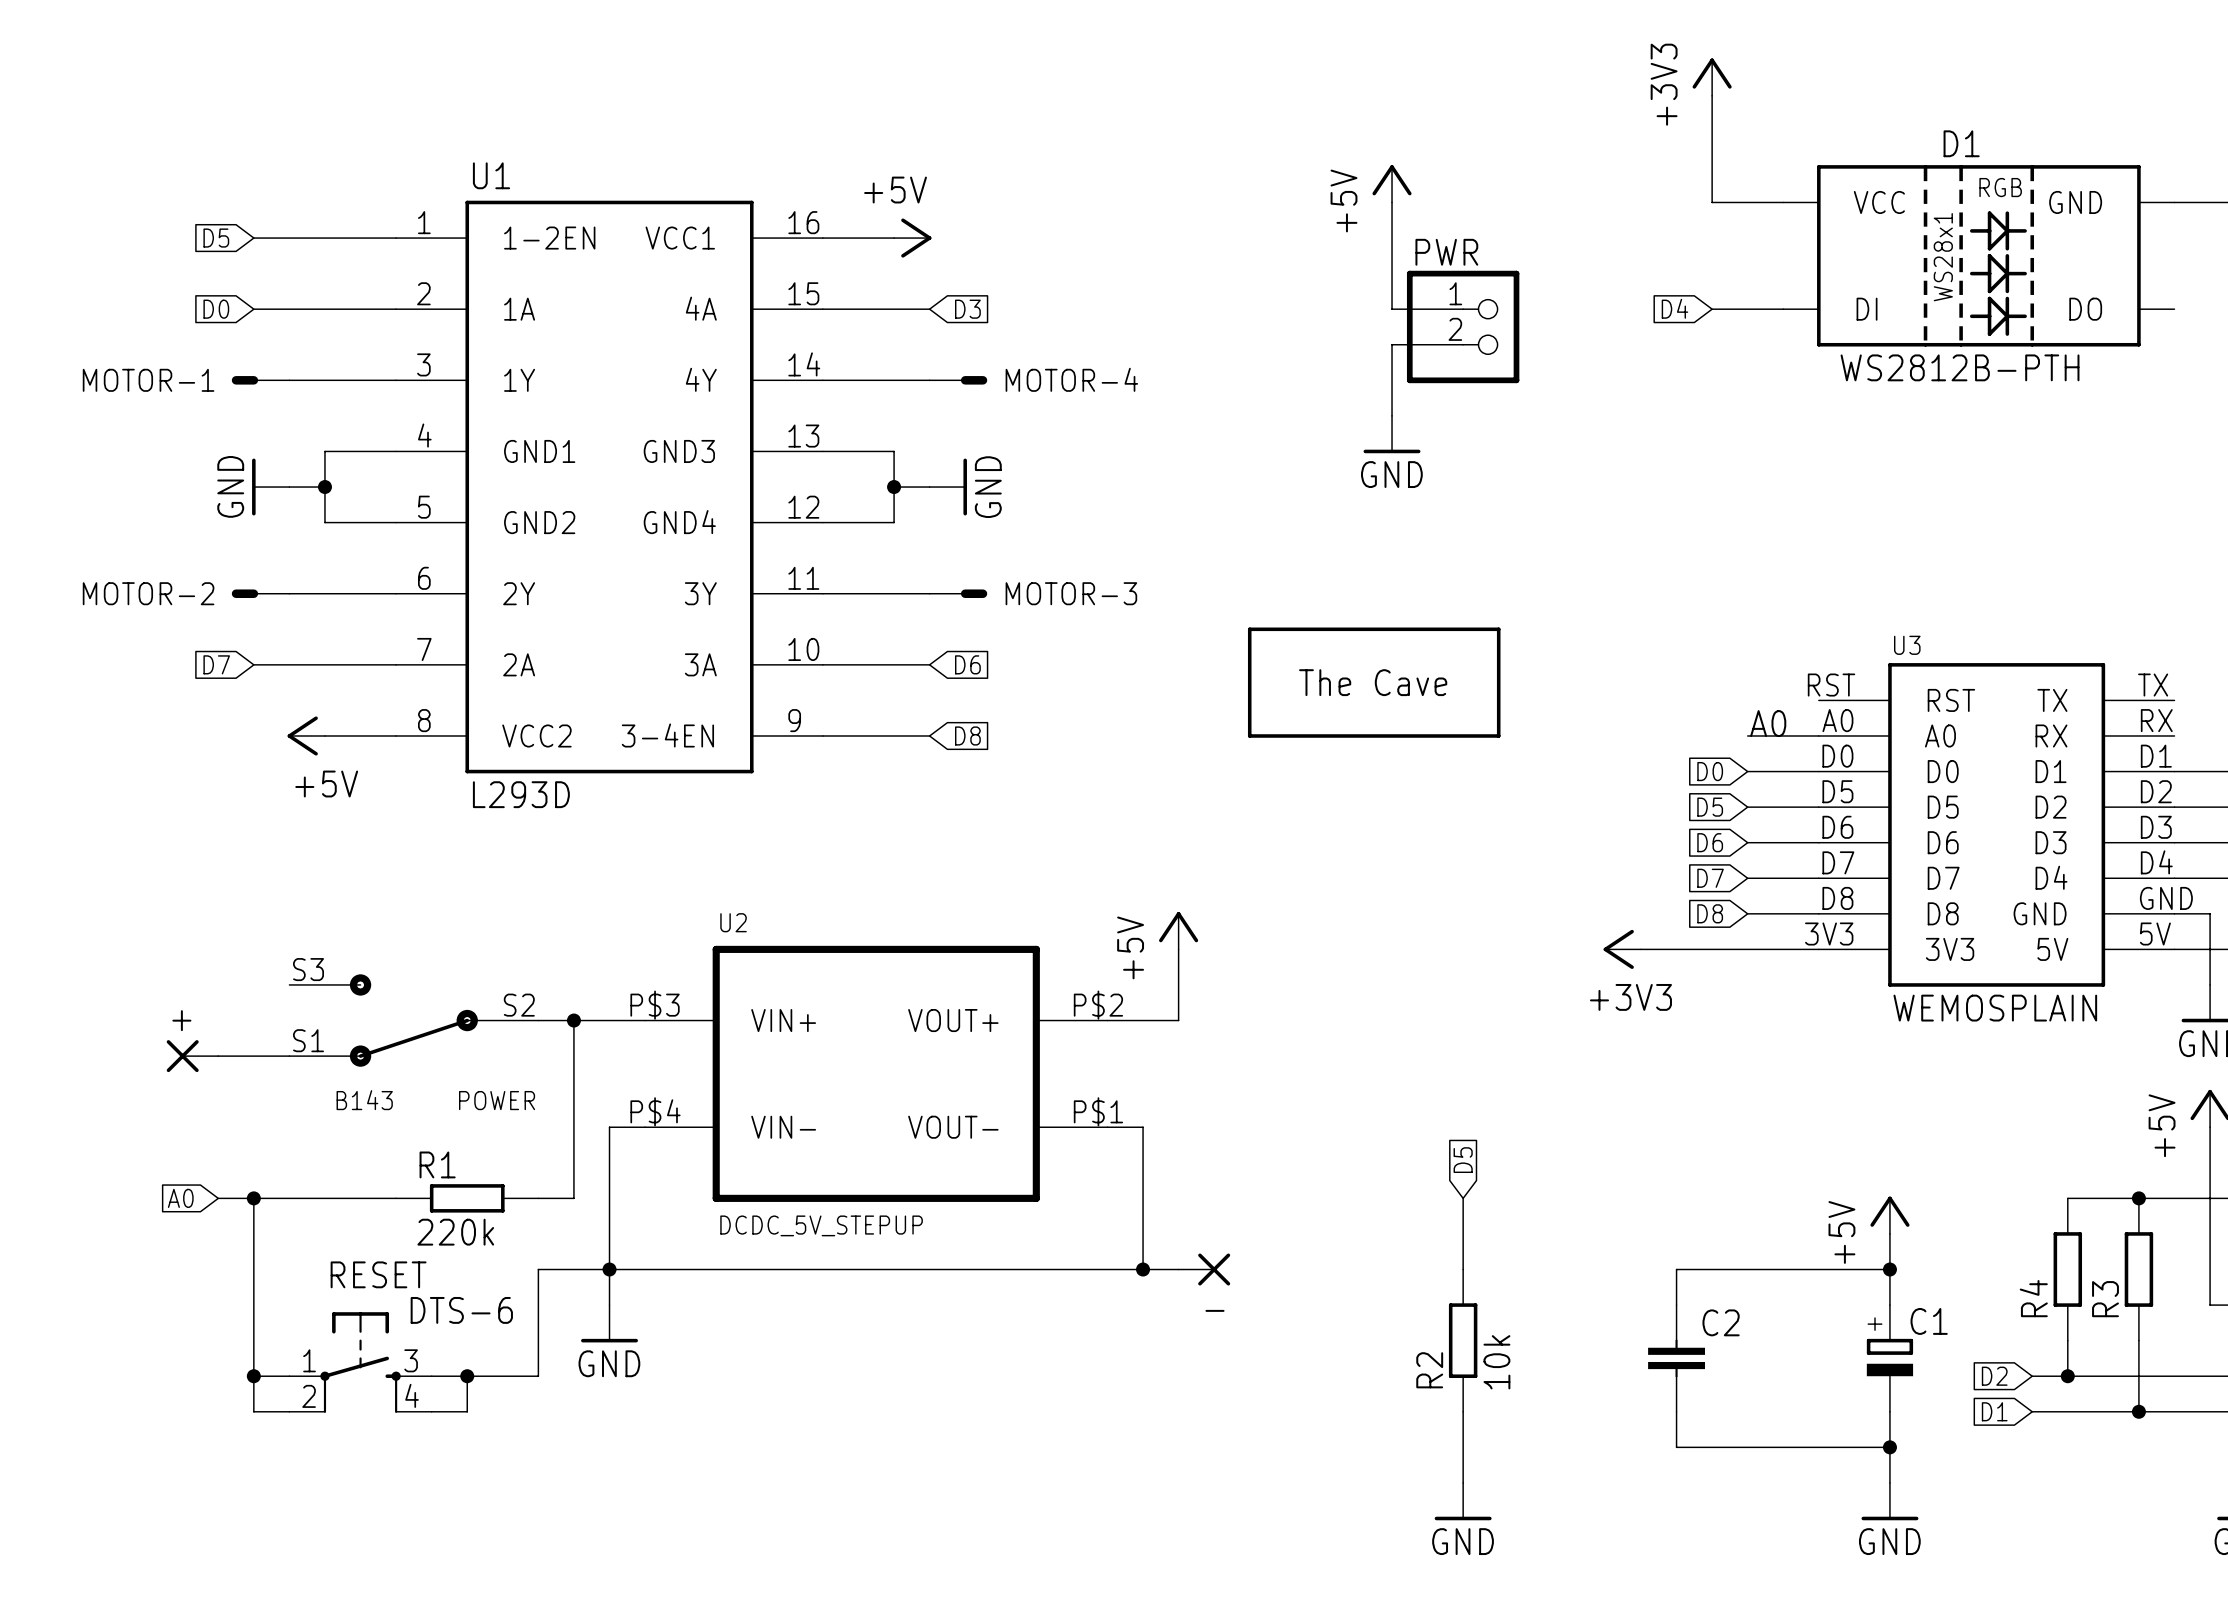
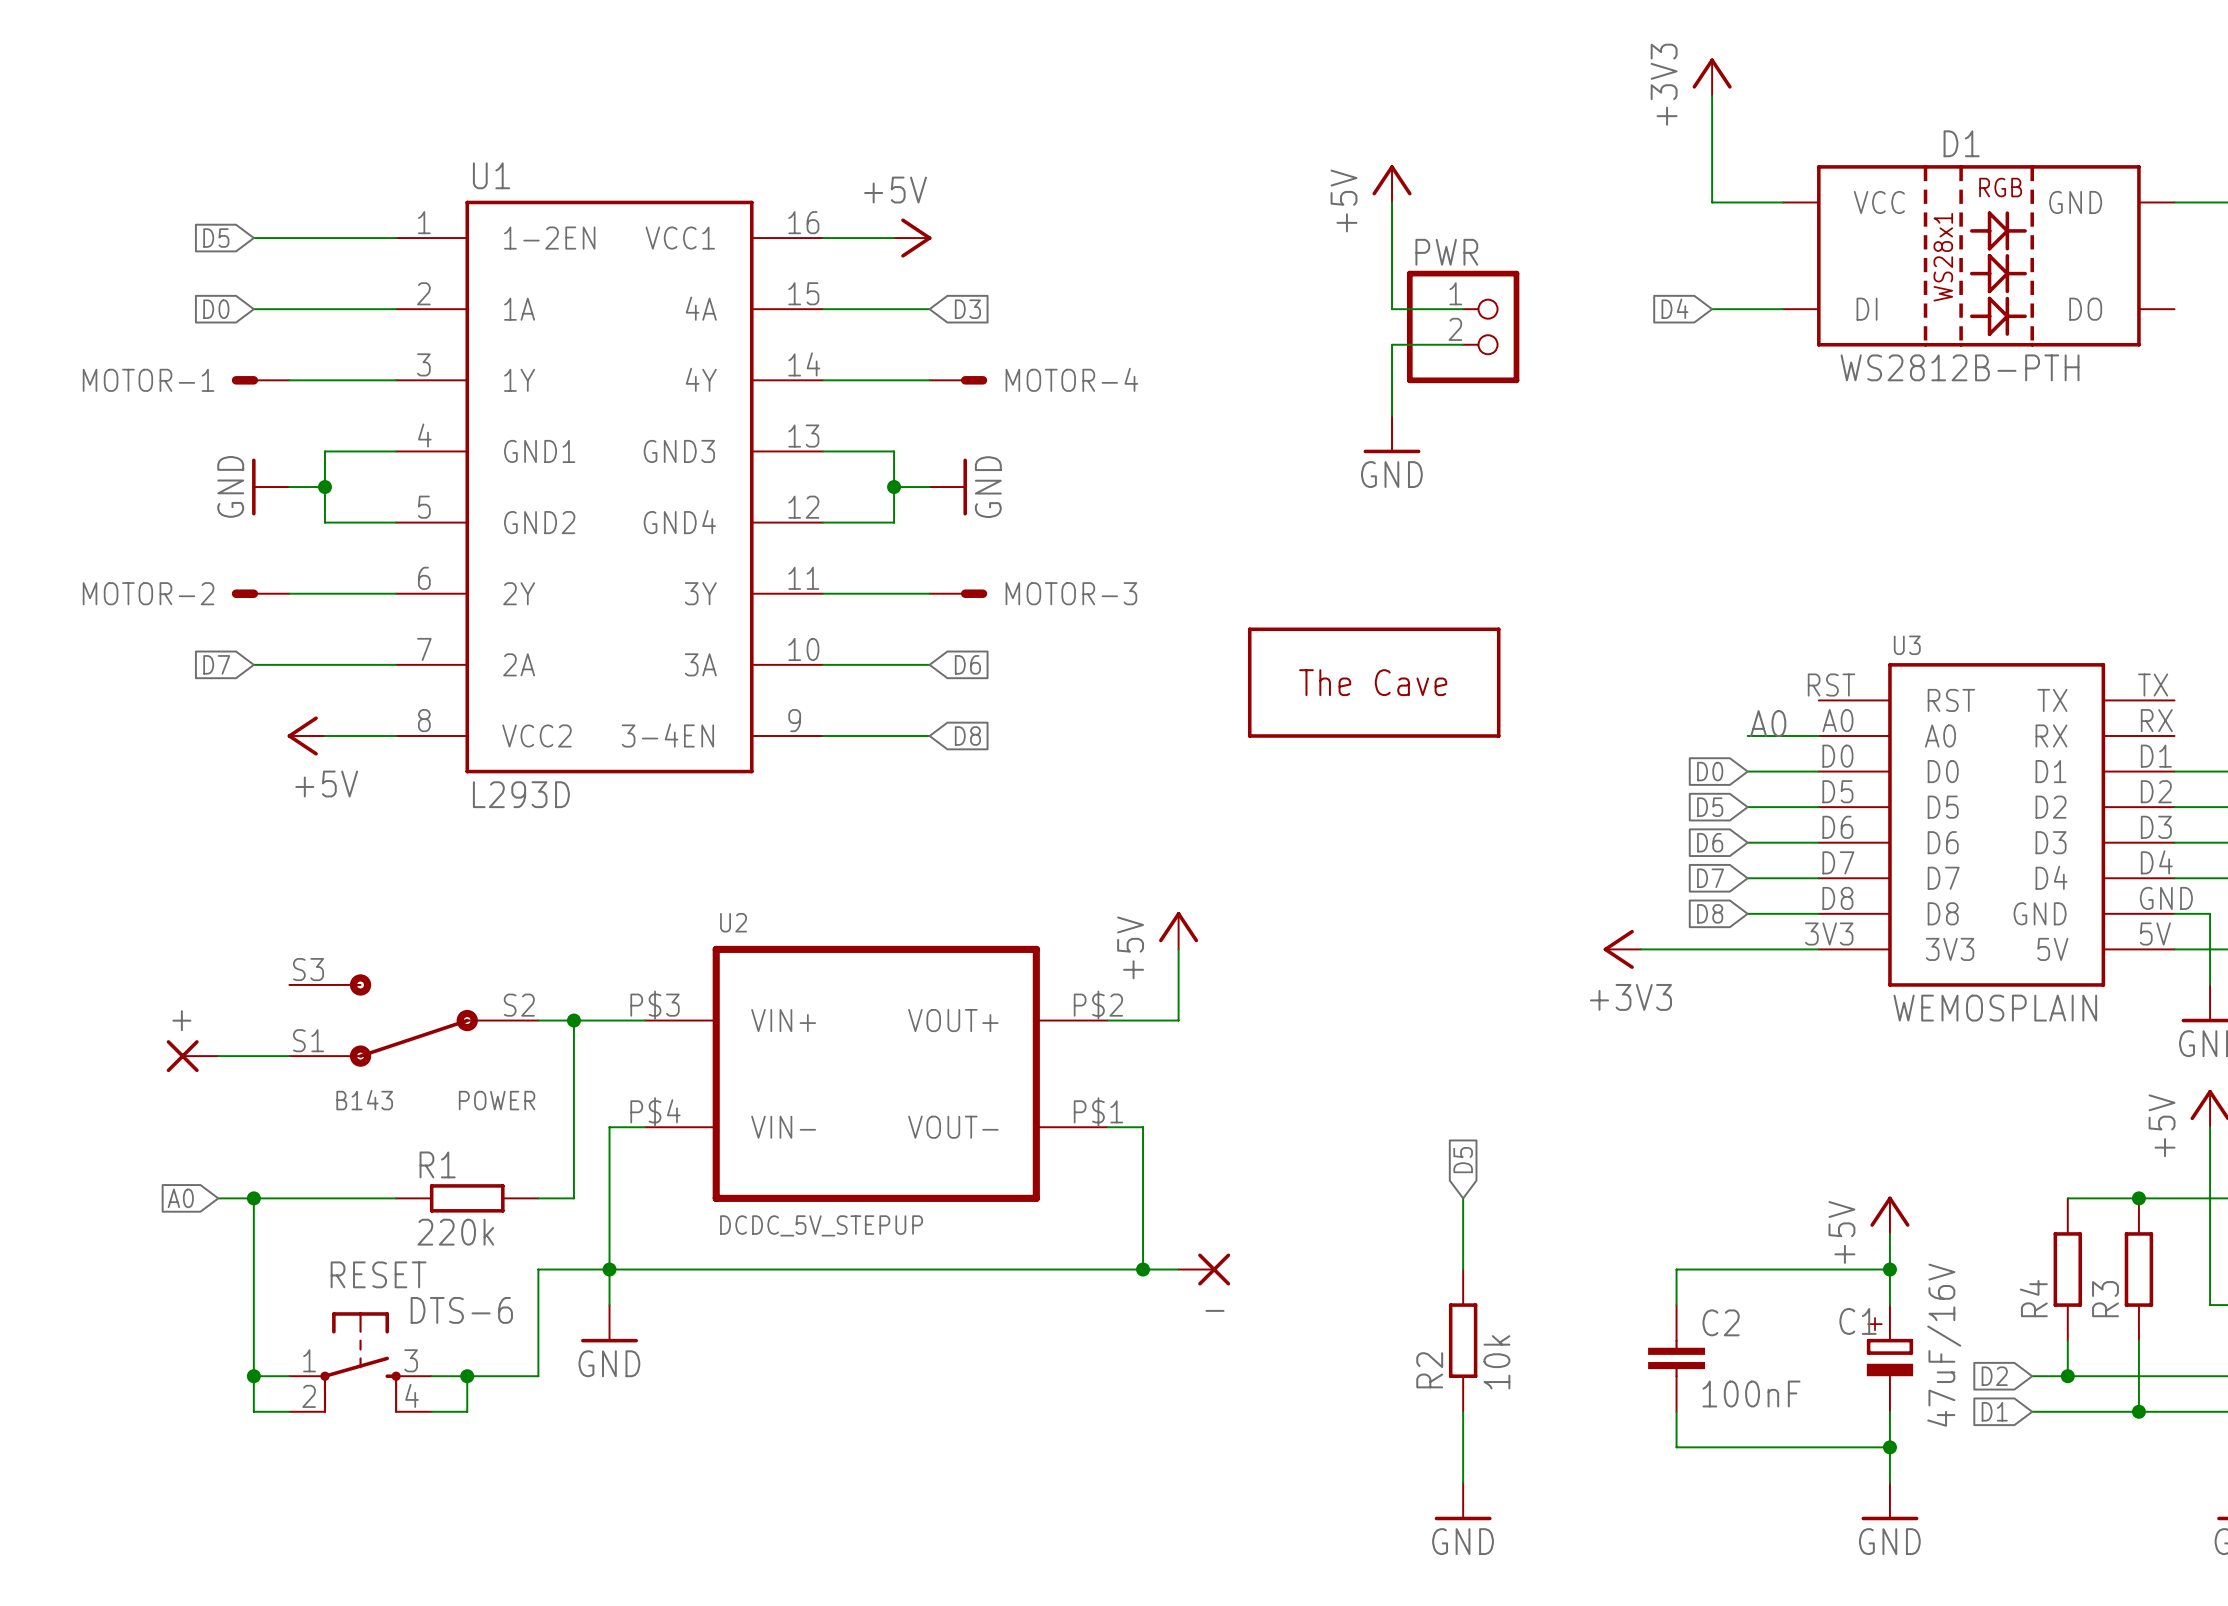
C1 name position: C1 (1929, 1321) -> C1 (1858, 1321)
C1 value: none -> 47uF/16V (1944, 1345)
C2 value: none -> 100nF (1751, 1394)

